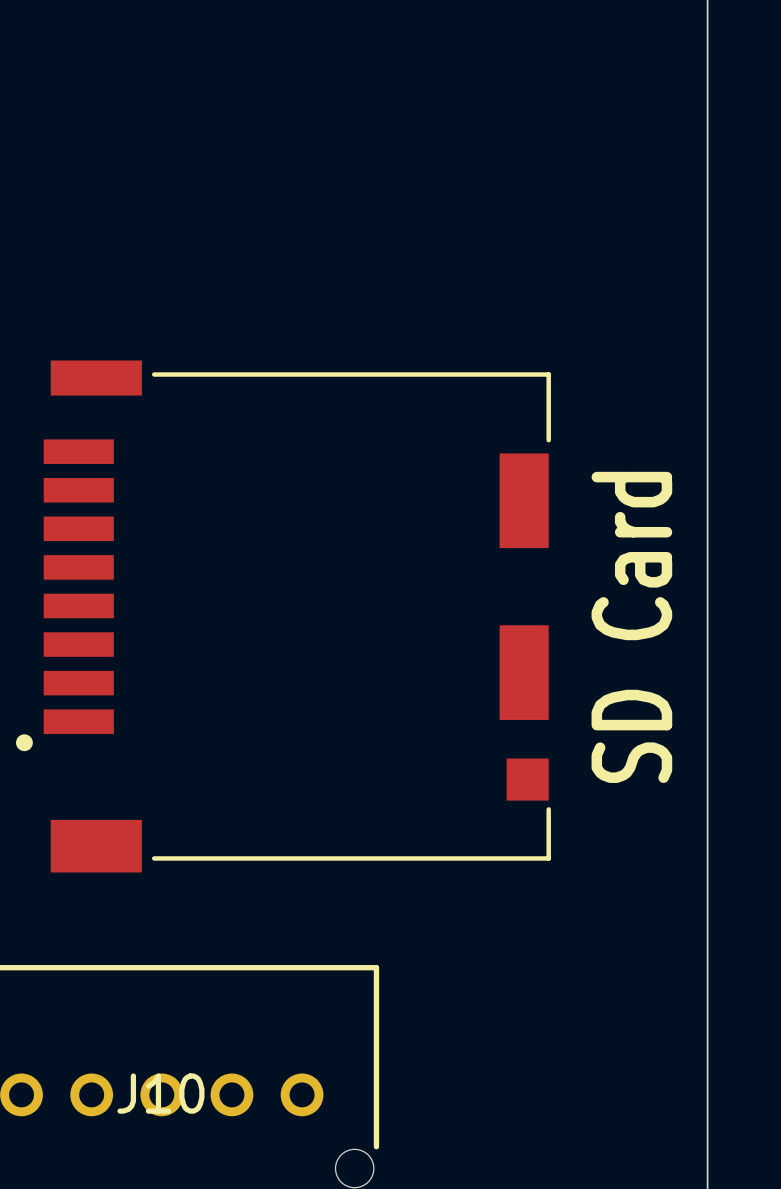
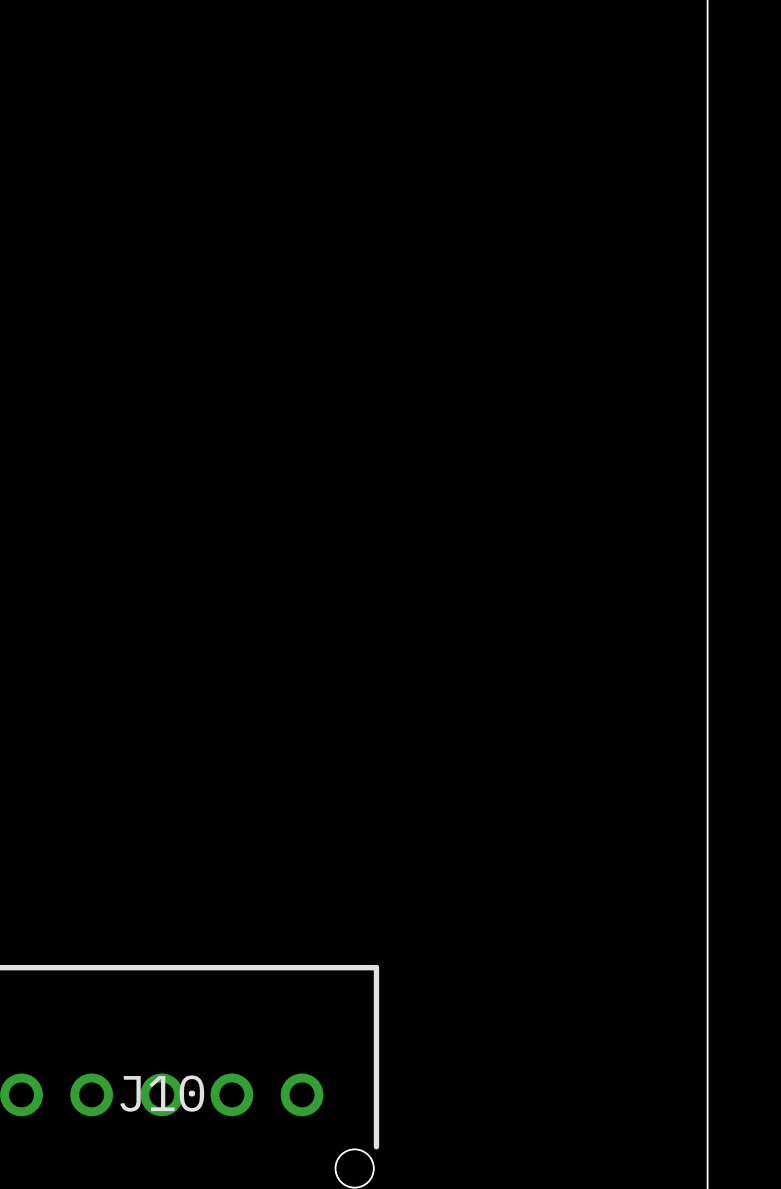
part: (283, 616) -> none
text: SD Card (631, 627) -> none

